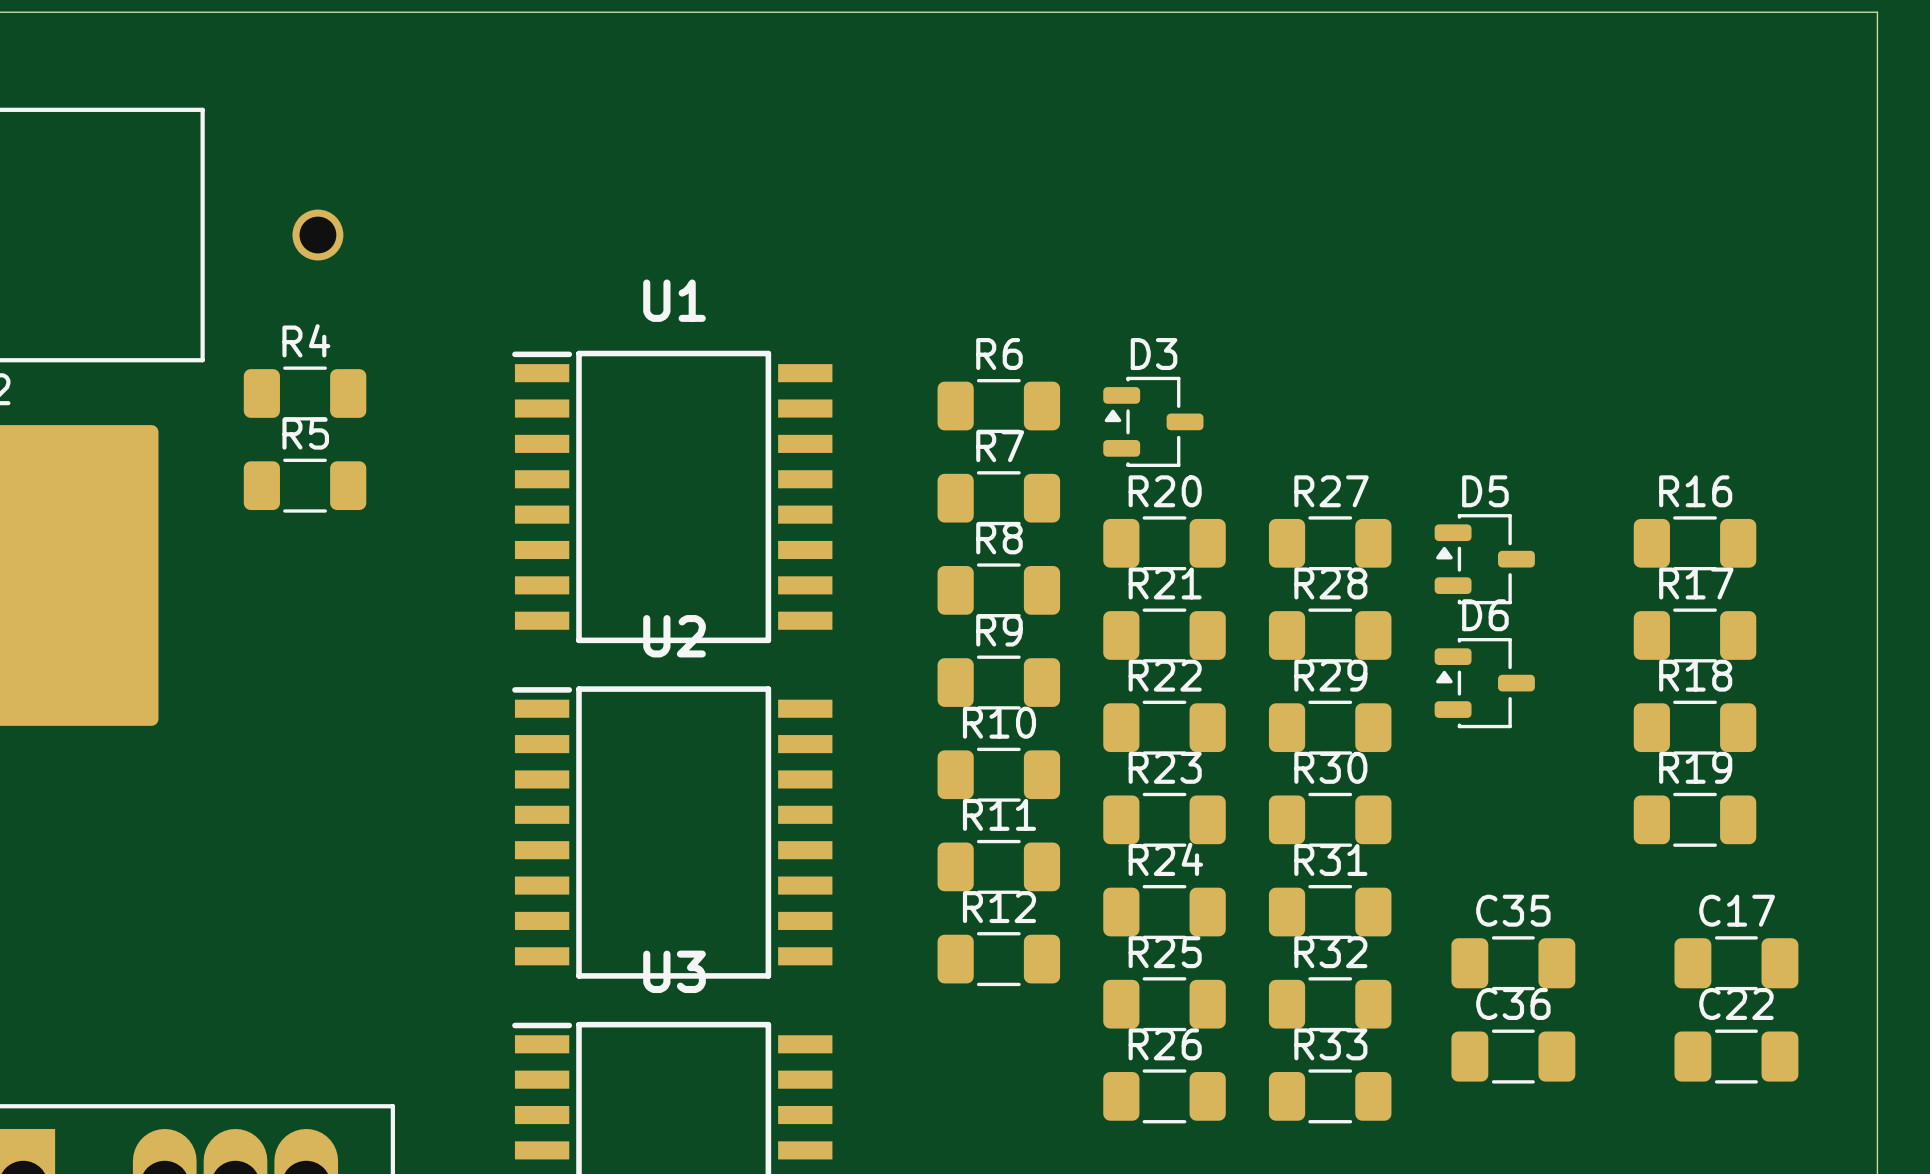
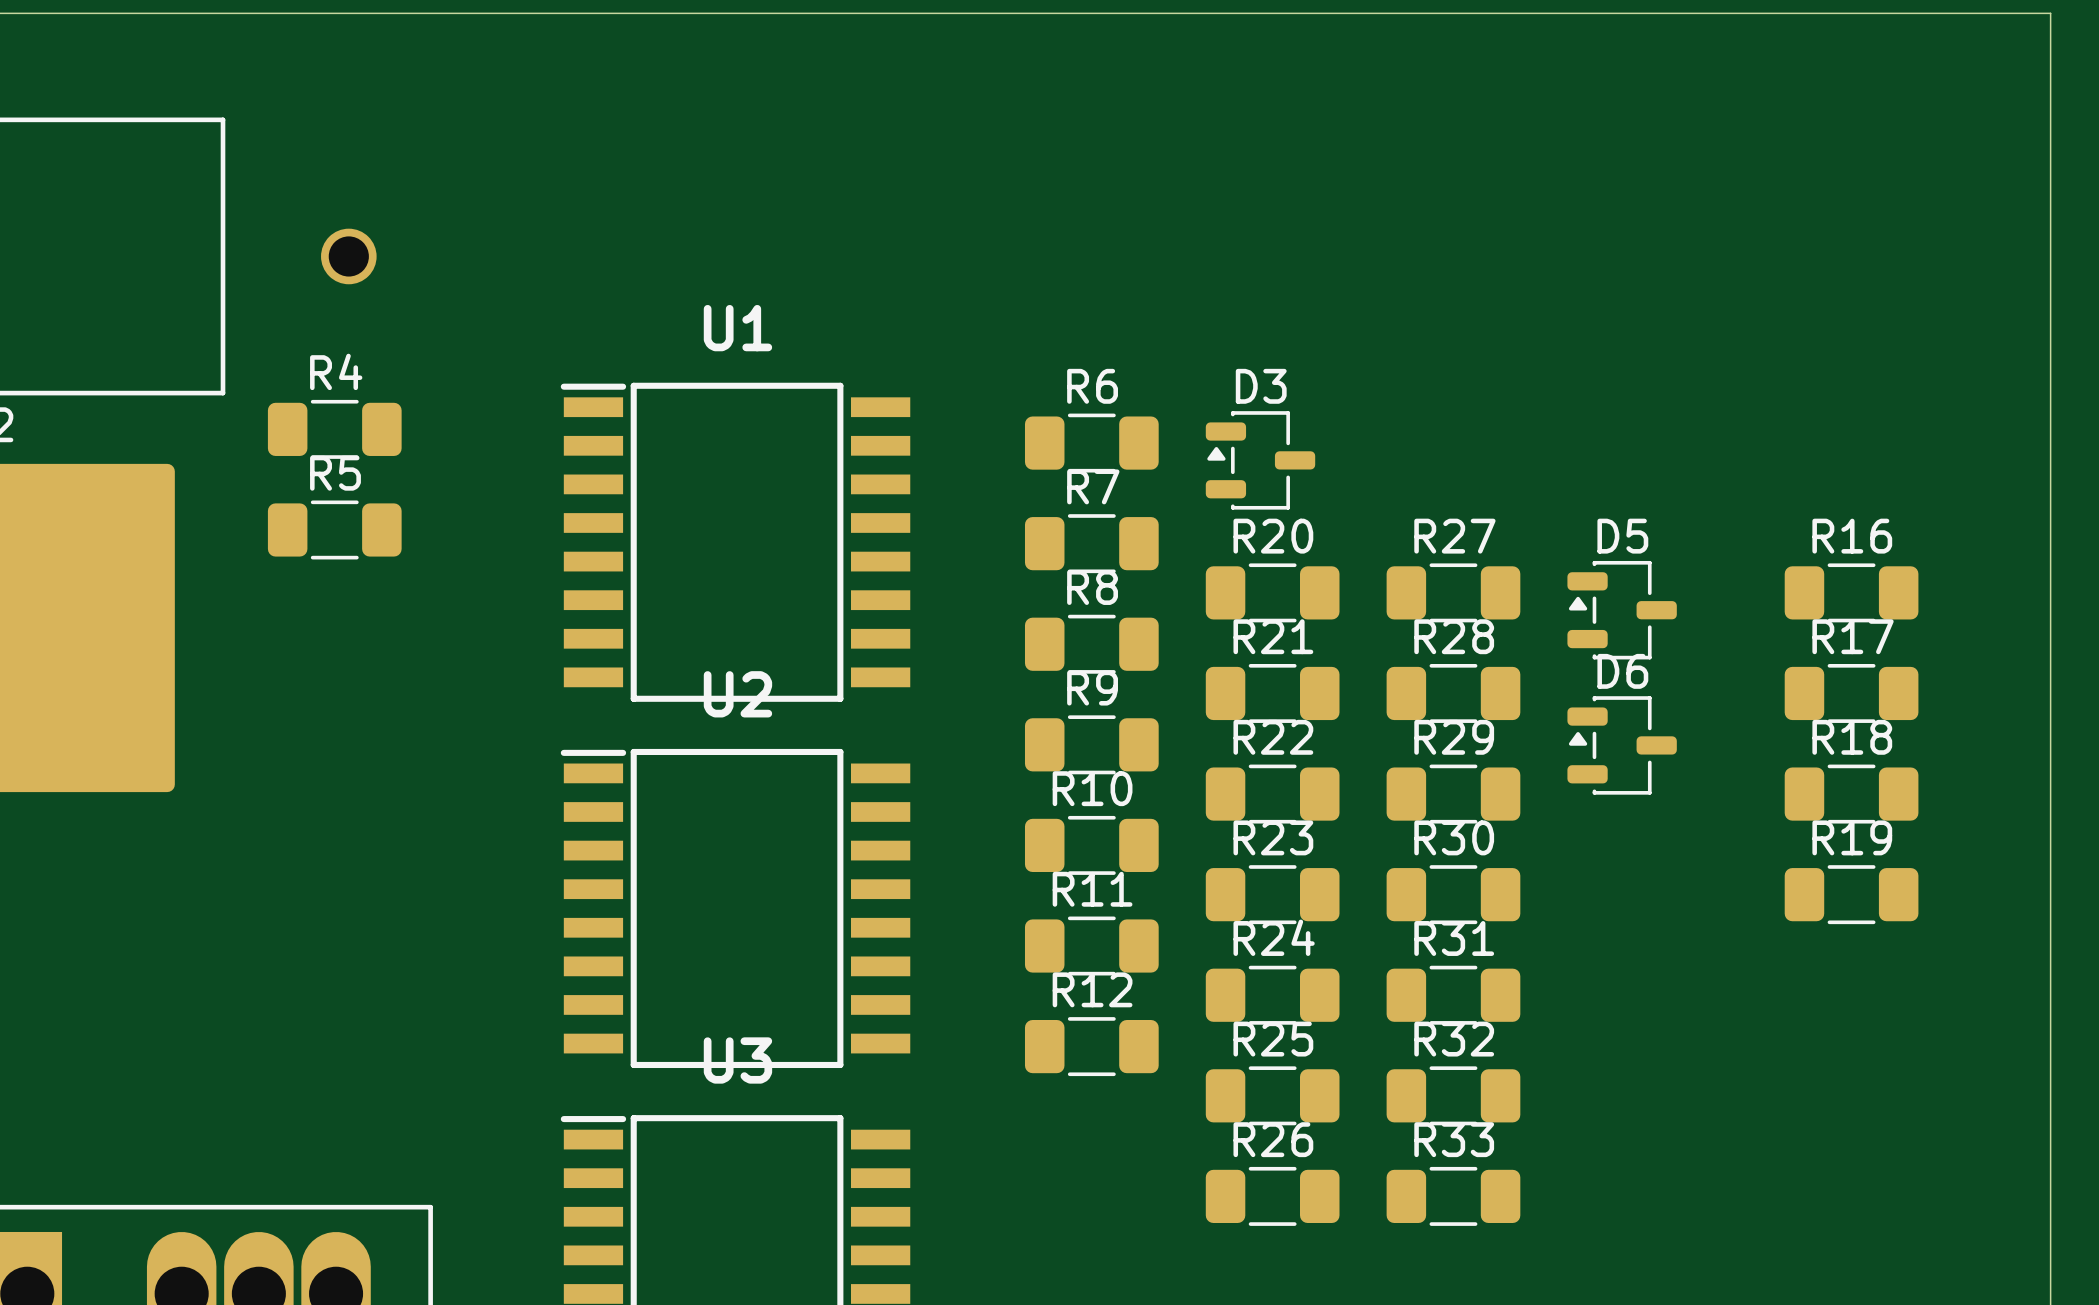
C35: (1513, 963) -> none
C17: (1736, 963) -> none
C36: (1513, 1056) -> none
C22: (1736, 1056) -> none

